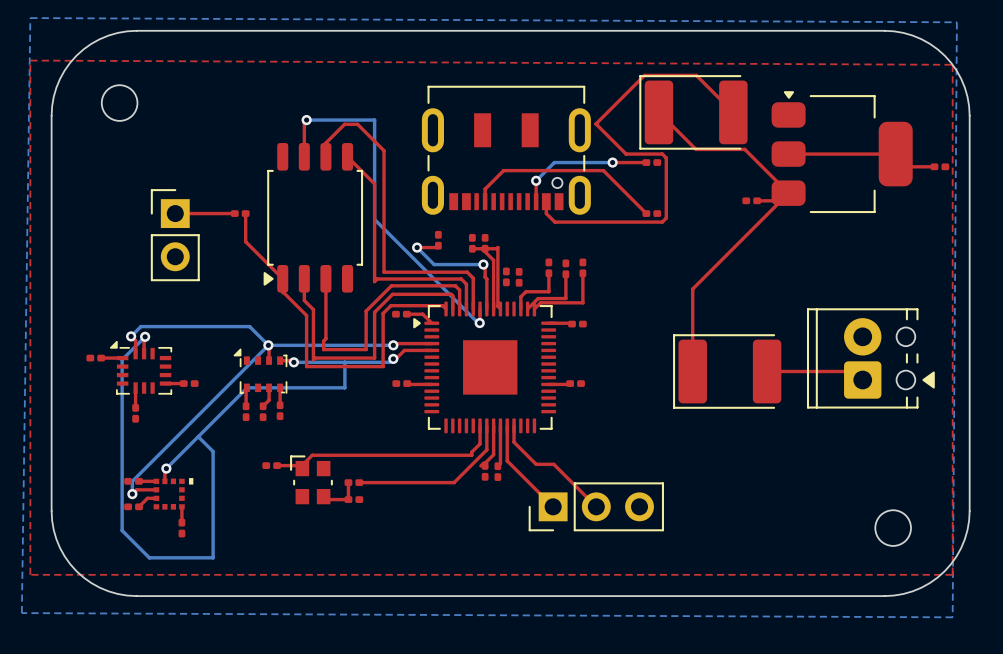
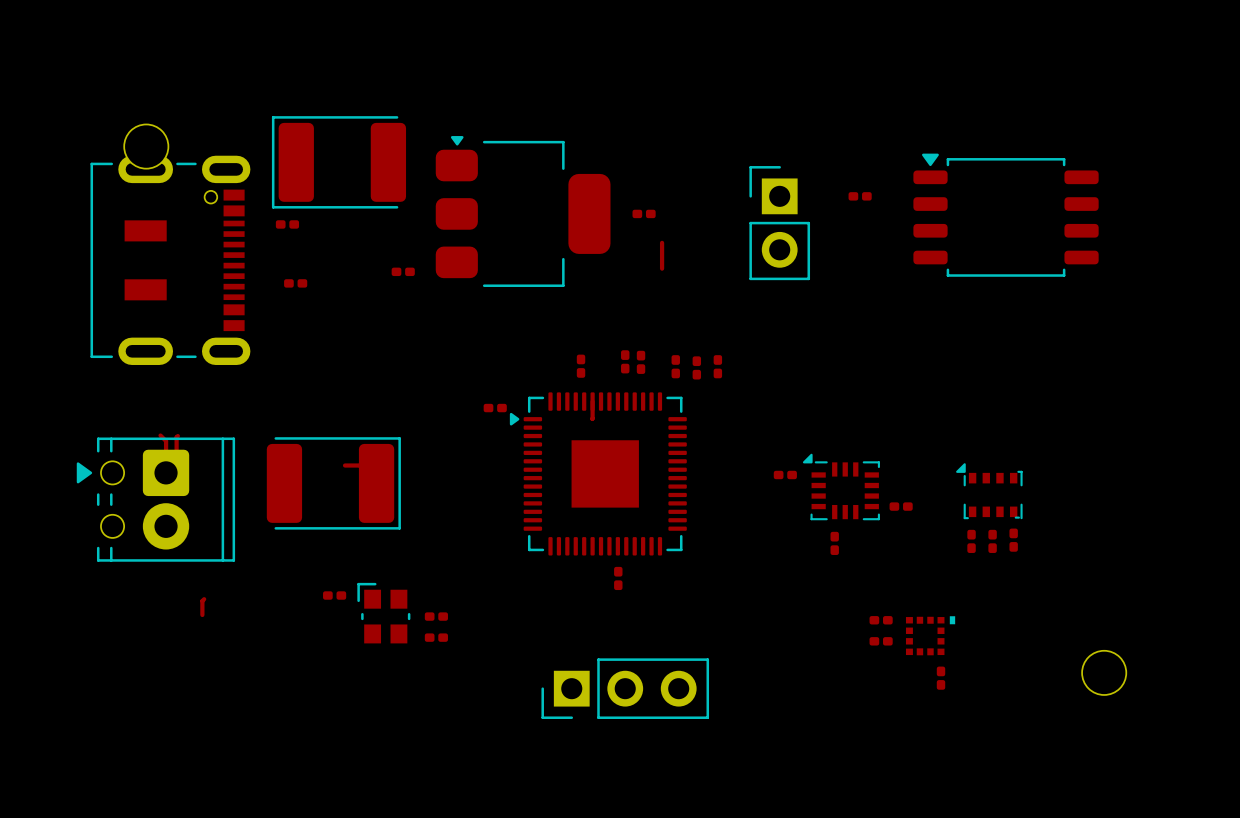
bottom zone outline: (30, 18) (956, 22) (952, 617) (21, 613) (30, 18) -> none
board edge: (136, 30) (884, 30) (903, 32) (929, 43) (944, 55) (961, 78) (967, 96) (969, 115) (969, 511) (967, 529) (956, 556) (944, 571) (921, 587) (903, 593) (884, 596) (136, 596) (117, 593) (91, 583) (76, 571) (64, 556) (56, 539) (52, 520) (52, 106) (60, 78) (70, 62) (83, 49) (108, 35) (136, 30) -> none
top zone outline: (30, 60) (952, 64) (952, 574) (30, 574) (30, 60) -> none
part footprint: [421, 85, 591, 215] -> [632, 209, 656, 219]
top track: (658, 112) (695, 149) (744, 149) (788, 193) (692, 289) (692, 371) -> none
part: (693, 112) -> none
top track: (733, 112) (696, 75) (644, 75) (596, 123) (626, 154) (662, 154) (666, 157) (666, 218) (662, 222) (554, 222) (546, 213) (546, 201) -> none
part: none -> (338, 162)
top track: (306, 120) (304, 122) (304, 156) -> none
bottom track: (306, 120) (374, 120) (374, 219) (479, 323) -> none
via: (306, 120) -> none
part: none -> (860, 196)
part position: (842, 152) -> (523, 211)
top track: (788, 154) (895, 154) (908, 166) (934, 166) -> none
top track: (325, 156) (325, 143) (344, 124) (357, 124) (384, 150) (384, 272) (467, 272) (473, 278) (473, 308) -> none
top track: (347, 156) (374, 183) (374, 281) (377, 279) (461, 279) (466, 284) (466, 308) -> none
part: none -> (1006, 215)
top track: (612, 162) (646, 162) -> none
bottom track: (612, 162) (554, 162) (536, 180) -> none
via: (612, 162) -> none
part: (651, 162) -> none
part: none -> (779, 223)
part: none -> (287, 224)
part: (939, 166) -> none
via: (536, 180) -> none
part: none -> (170, 260)
part: (751, 200) -> none
top track: (757, 200) (780, 200) -> none
top track: (485, 201) (485, 189) (503, 170) (603, 170) (646, 213) -> none
part: none -> (403, 271)
top track: (175, 213) (234, 213) -> none
top track: (245, 213) (245, 241) (282, 278) (282, 292) -> none
part: (651, 213) -> none
part: (313, 217) -> none
part: (175, 235) -> none
part: (438, 240) -> none
part: (472, 243) -> none
part: (485, 243) -> none
top track: (438, 245) (436, 247) (417, 247) -> none
bottom track: (417, 247) (434, 264) (483, 264) -> none
via: (417, 247) -> none
top track: (472, 248) (482, 248) (493, 260) (493, 308) -> none
top track: (485, 248) (497, 247) (497, 306) (500, 308) -> none
top track: (483, 264) (486, 279) (486, 308) -> none
via: (483, 264) -> none
part: (548, 267) -> none
part: (582, 267) -> none
part: (565, 268) -> none
top track: (548, 273) (548, 291) (525, 291) (520, 296) (520, 308) -> none
top track: (581, 273) (582, 302) (540, 302) (534, 308) -> none
top track: (565, 274) (565, 298) (538, 298) (527, 308) -> none
top track: (304, 278) (304, 300) (313, 309) (313, 359) (315, 358) (374, 358) (374, 312) (392, 294) (451, 294) (452, 308) -> none
top track: (325, 278) (325, 338) (323, 341) (323, 349) (366, 349) (366, 311) (391, 285) (455, 285) (459, 290) (459, 308) -> none
part: none -> (581, 366)
part: none -> (675, 366)
part: none -> (717, 366)
part: none -> (696, 367)
top track: (282, 291) (306, 315) (306, 366) (383, 366) (383, 313) (390, 305) (442, 305) (446, 308) -> none
top track: (406, 314) (422, 314) (431, 323) -> none
via: (479, 323) -> none
top track: (548, 323) (572, 324) -> none
part: (577, 324) -> none
bottom track: (131, 336) (140, 326) (249, 326) (268, 345) -> none
via: (131, 336) -> none
bottom track: (145, 336) (122, 359) (122, 530) (149, 557) (213, 557) (213, 451) (198, 436) -> none
via: (145, 336) -> none
top track: (431, 343) (395, 343) (393, 345) -> none
top track: (268, 345) (269, 360) -> none
bottom track: (268, 345) (395, 345) -> none
bottom track: (268, 345) (132, 481) (132, 494) -> none
via: (268, 345) -> none
via: (393, 345) -> none
part footprint: [233, 348, 288, 394] -> [266, 437, 401, 530]
top track: (431, 350) (404, 350) (395, 358) (393, 358) -> none
part: (95, 358) -> none
top track: (101, 358) (122, 358) -> none
bottom track: (393, 358) (389, 362) (293, 362) -> none
via: (393, 358) -> none
part: (870, 358) -> none
via: (293, 362) -> none
bottom track: (344, 362) (344, 387) (247, 387) (166, 468) -> none
part: (141, 367) -> none
part: none -> (785, 474)
part: (727, 371) -> none
top track: (767, 371) (854, 371) (862, 380) -> none
part: none -> (841, 486)
part: none -> (989, 491)
top track: (165, 383) (183, 383) -> none
part: (189, 383) -> none
part: (401, 383) -> none
top track: (407, 383) (431, 384) -> none
top track: (570, 383) (548, 384) -> none
part: (575, 383) -> none
top track: (246, 387) (246, 406) -> none
top track: (269, 387) (269, 400) (263, 406) -> none
top track: (280, 387) (280, 405) -> none
part: none -> (155, 499)
top track: (135, 388) (135, 407) -> none
part: none -> (901, 506)
part: (280, 410) -> none
part: (246, 411) -> none
part: (263, 411) -> none
part: (135, 413) -> none
part: none -> (1013, 540)
part: none -> (971, 541)
part: none -> (992, 541)
part: none -> (834, 543)
top track: (480, 425) (480, 443) (471, 452) (471, 455) (312, 455) (302, 465) (302, 468) (299, 465) (277, 465) -> none
top track: (486, 425) (486, 449) (454, 482) (359, 482) -> none
top track: (493, 425) (493, 454) (485, 463) (485, 465) -> none
top track: (500, 425) (500, 463) (497, 465) -> none
top track: (507, 425) (507, 460) (553, 506) -> none
top track: (514, 425) (514, 442) (536, 464) (553, 464) (596, 506) -> none
part: none -> (618, 578)
top track: (483, 463) (480, 465) -> none
via: (166, 468) -> none
part: (485, 471) -> none
part: (497, 471) -> none
part: (133, 481) -> none
top track: (139, 481) (156, 481) -> none
top track: (348, 482) (348, 499) (326, 499) (323, 496) -> none
part: none -> (881, 620)
top track: (156, 489) (136, 489) (132, 494) -> none
part: (173, 493) -> none
via: (132, 494) -> none
top track: (156, 498) (147, 498) (139, 506) -> none
part: none -> (930, 635)
part: none -> (881, 641)
part: (133, 506) -> none
top track: (181, 506) (181, 522) -> none
part position: (596, 506) -> (625, 688)
part: (181, 528) -> none
part: none -> (941, 678)

